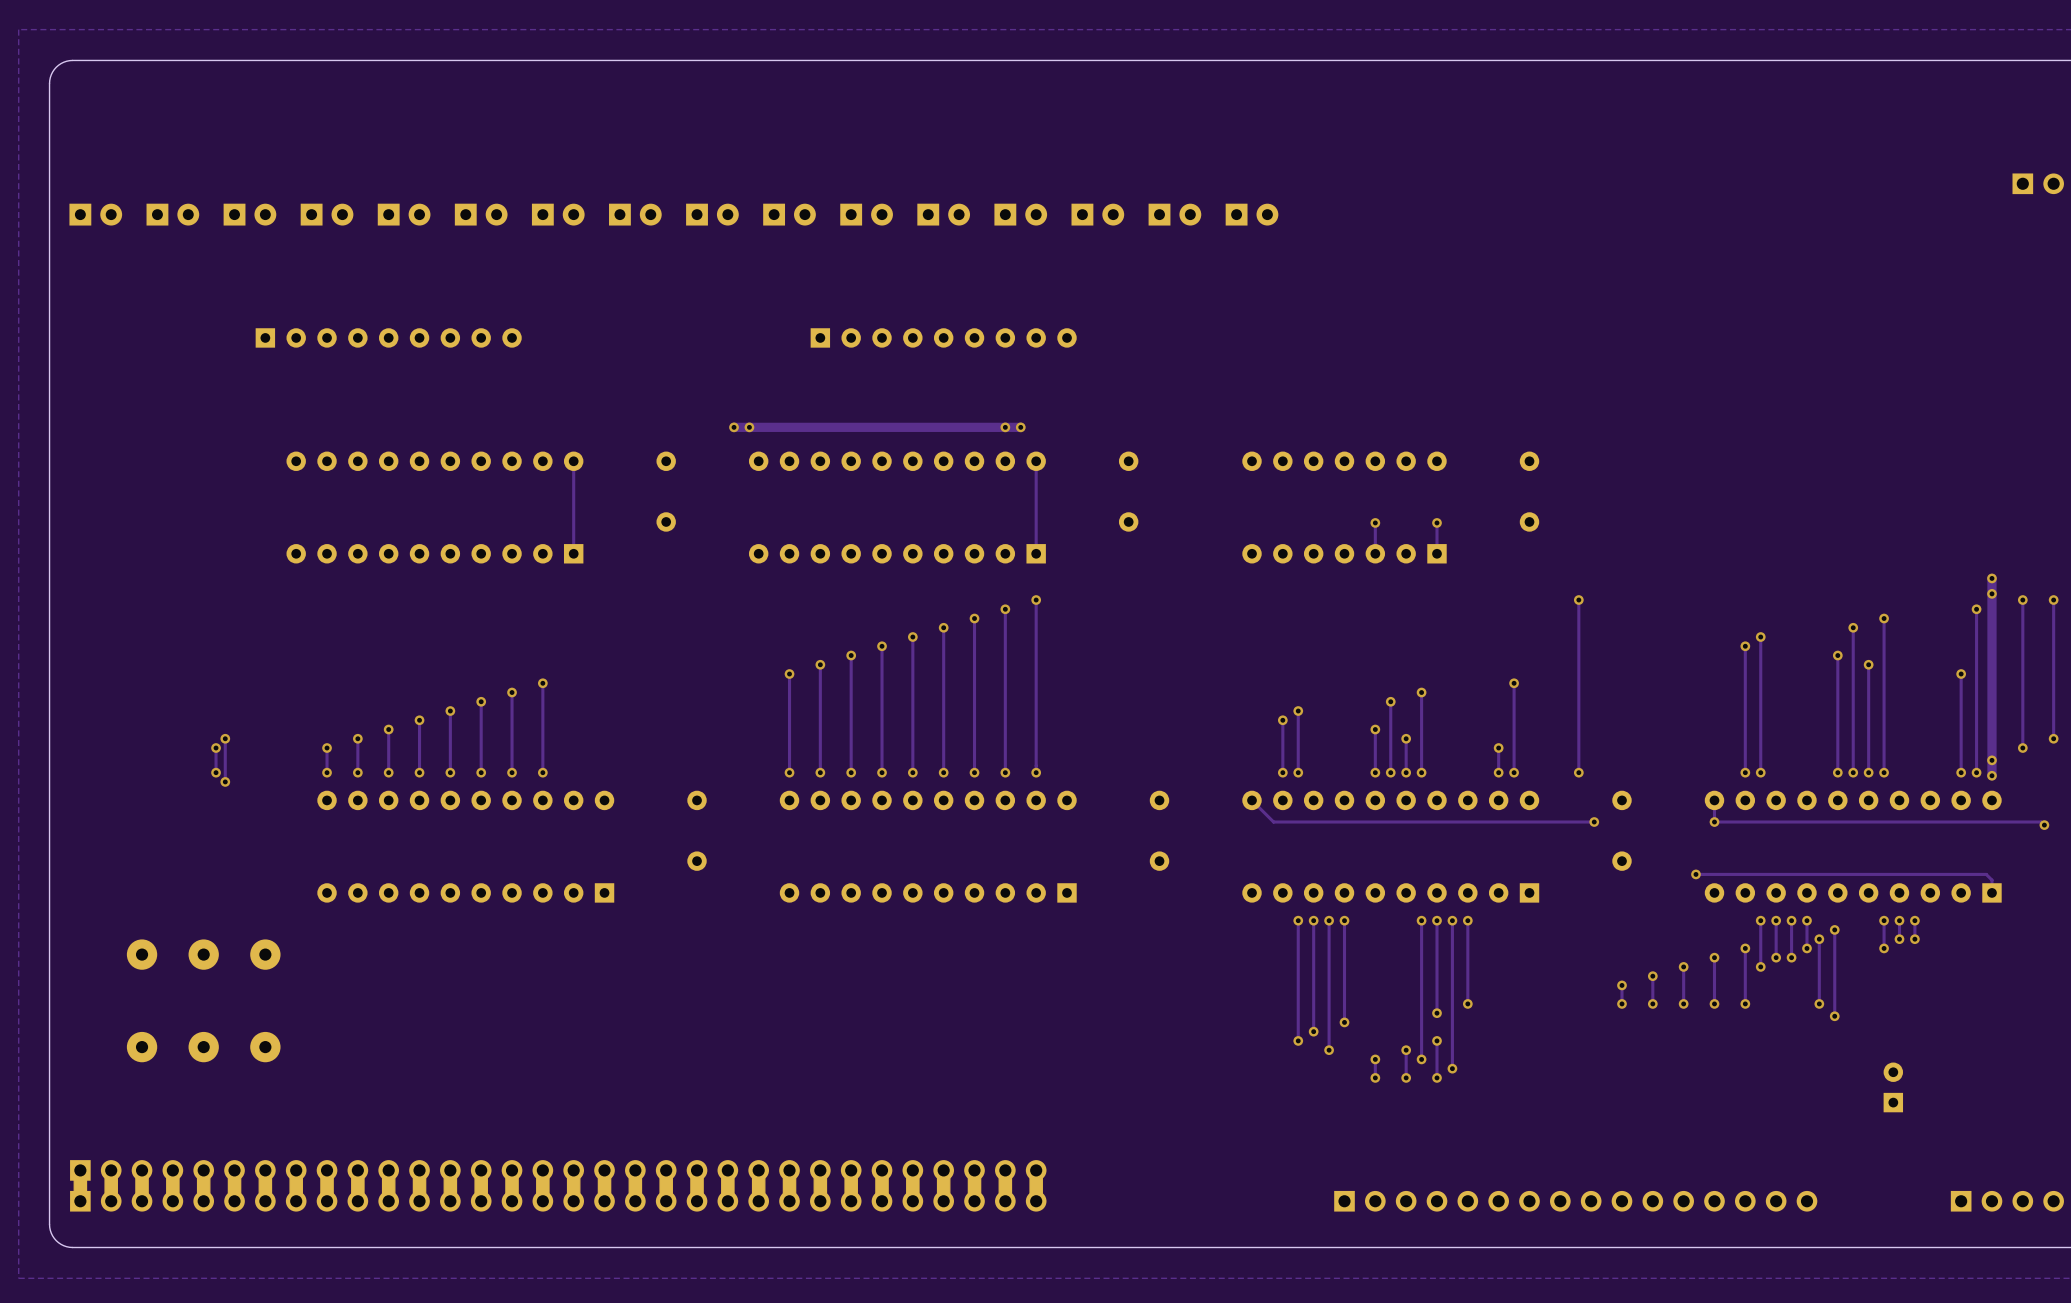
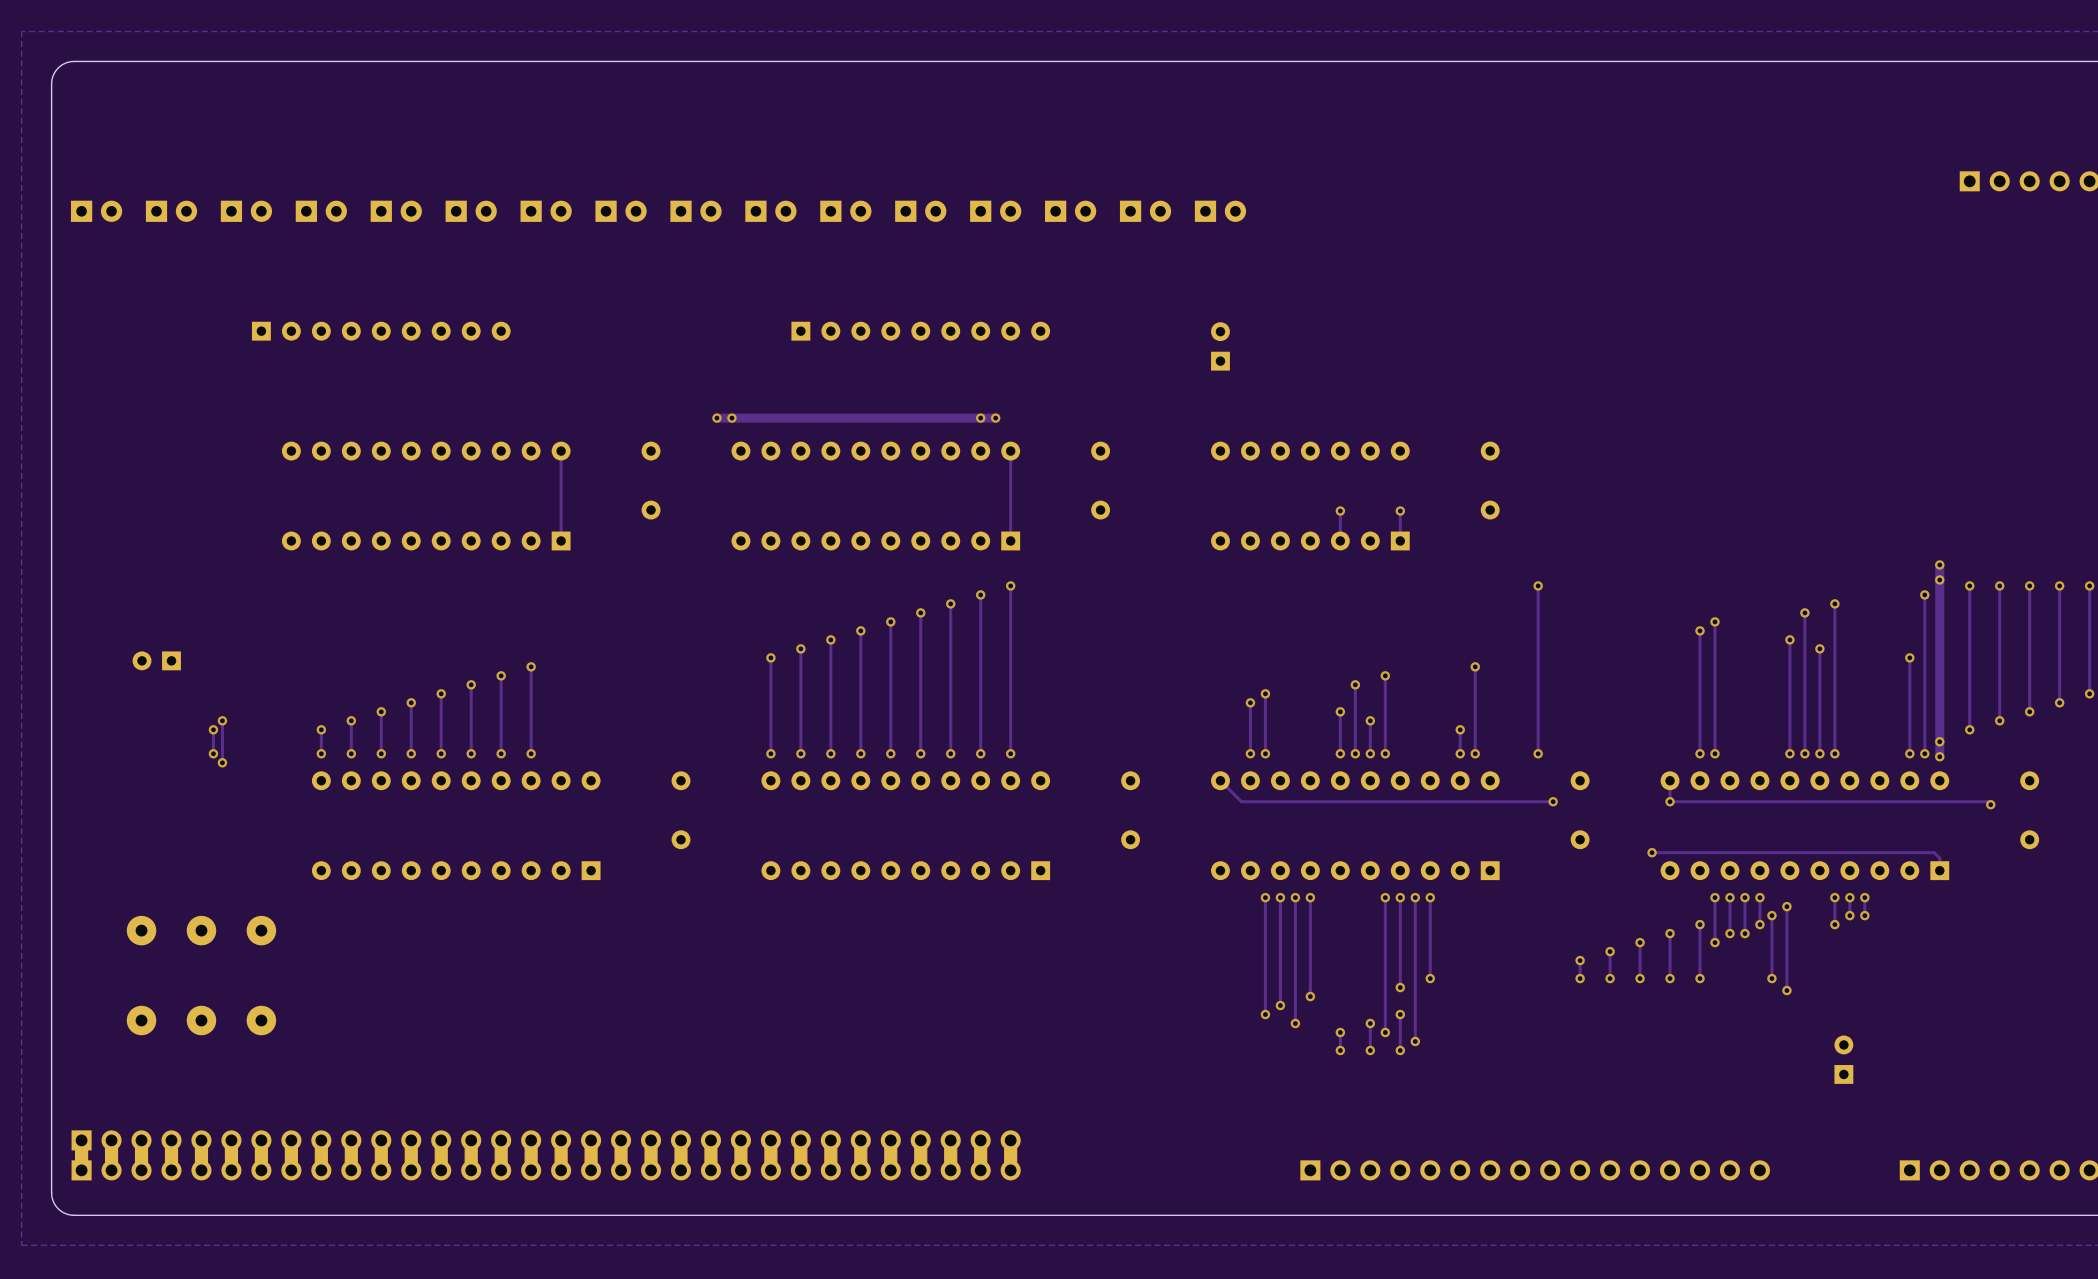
part: none -> (1220, 346)
part: none -> (156, 660)

